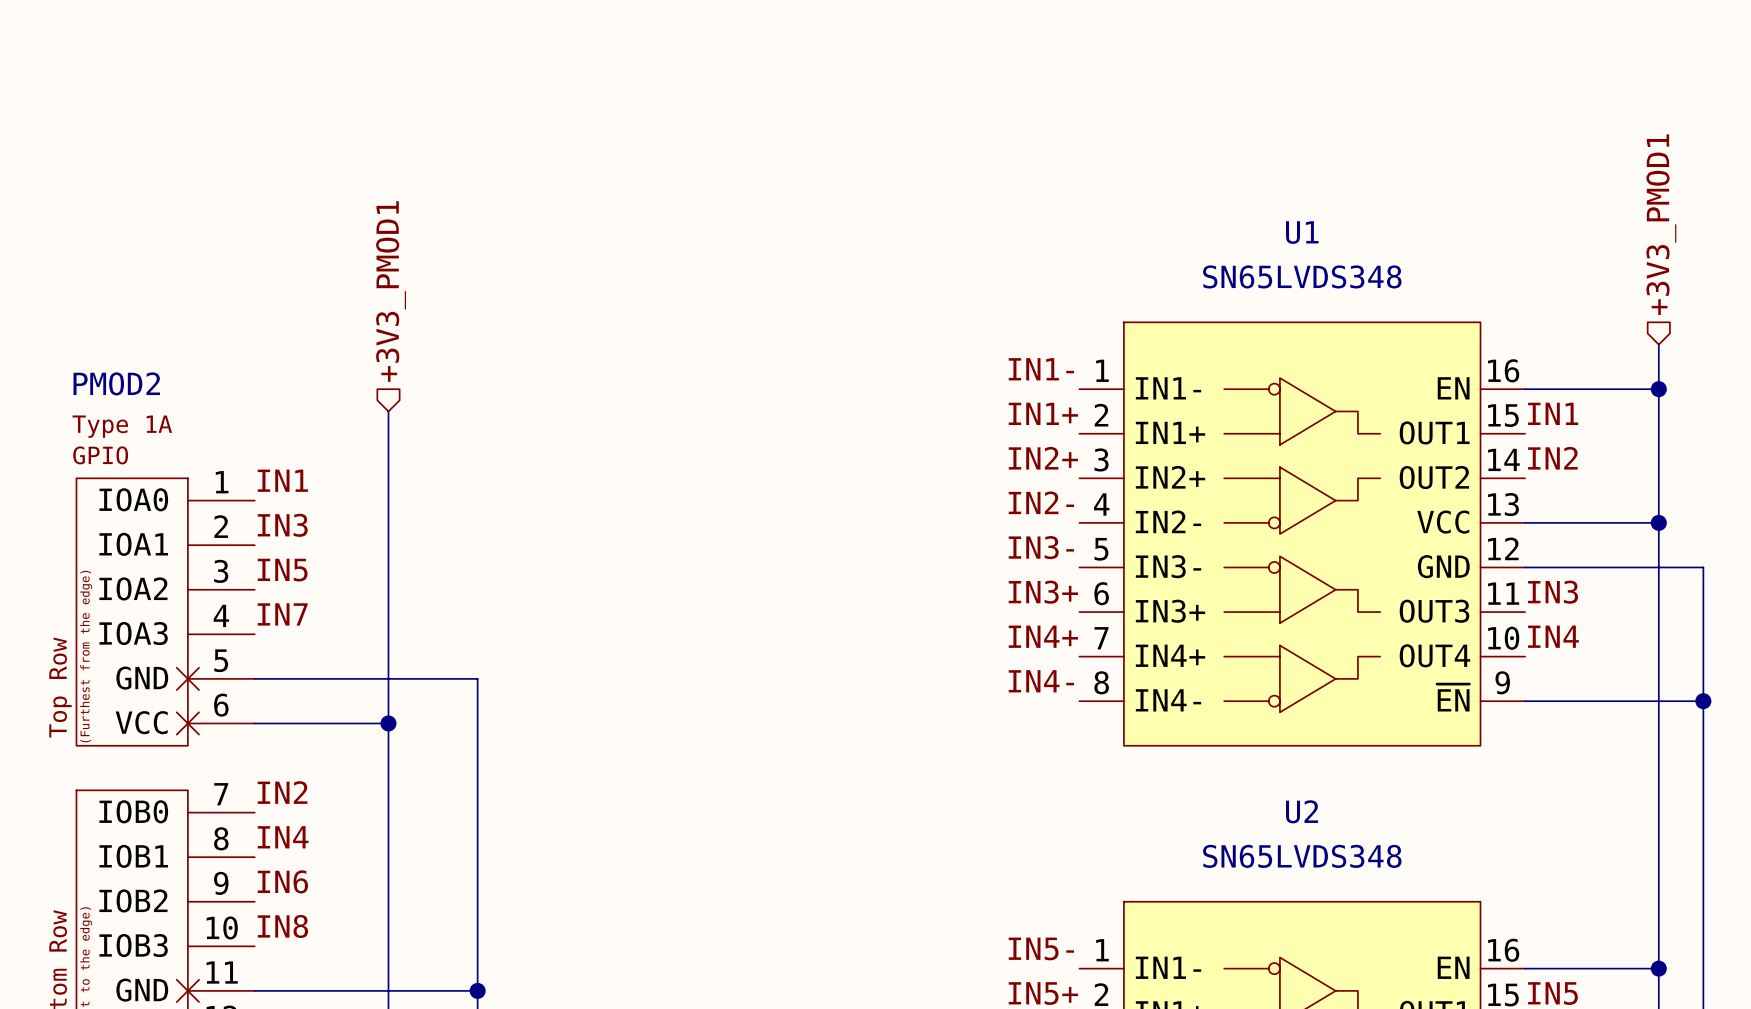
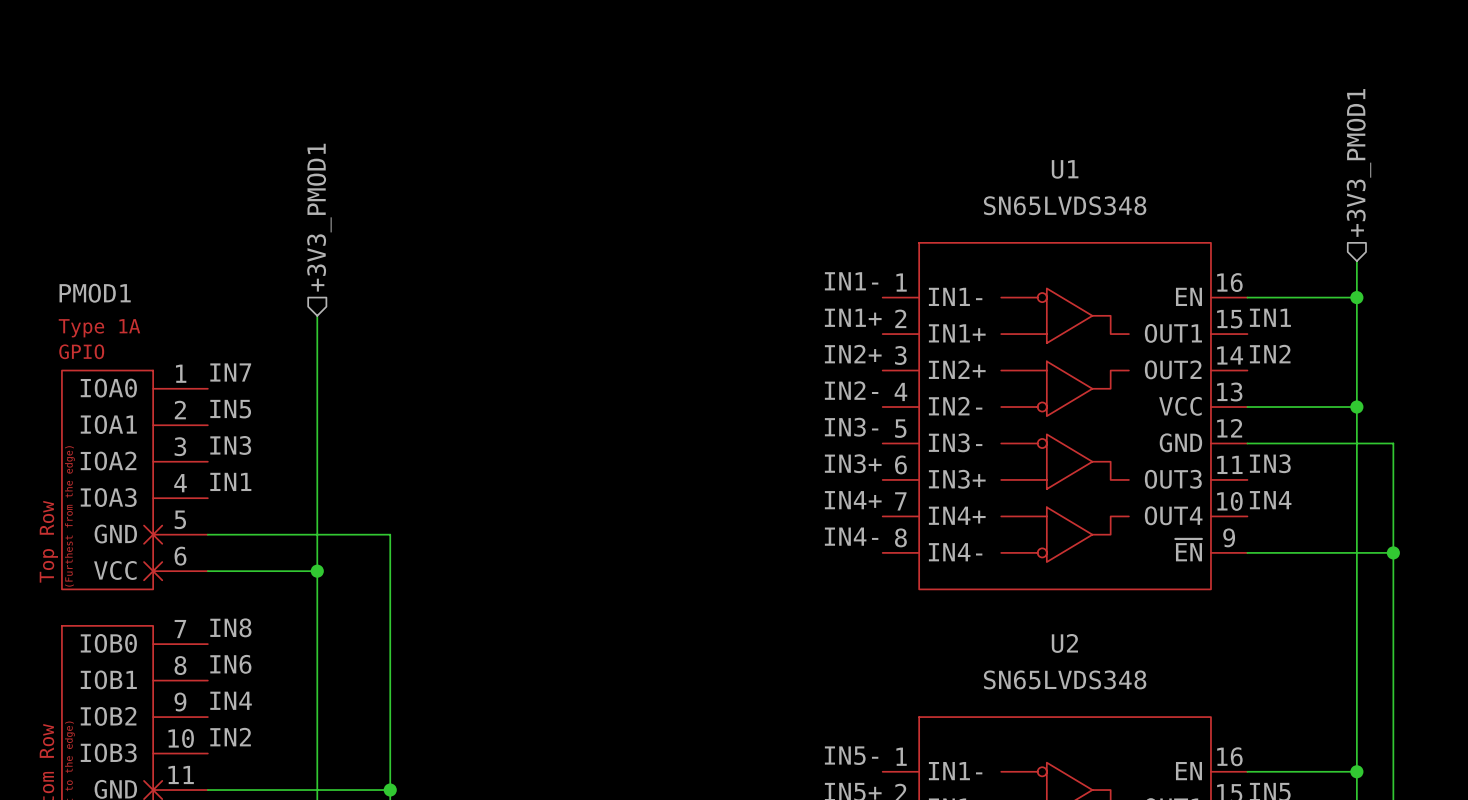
PMOD2 name: PMOD2 (116, 383) -> PMOD1 (95, 293)
label: IN1 (282, 480) -> IN7 (230, 372)
label: IN3 (282, 525) -> IN5 (230, 409)
label: IN5 (282, 570) -> IN3 (230, 445)
label: IN7 (282, 614) -> IN1 (230, 481)
label: IN2 (282, 792) -> IN8 (230, 627)
label: IN4 (283, 837) -> IN6 (230, 664)
label: IN6 (282, 881) -> IN4 (231, 700)
label: IN8 (282, 926) -> IN2 (230, 737)

